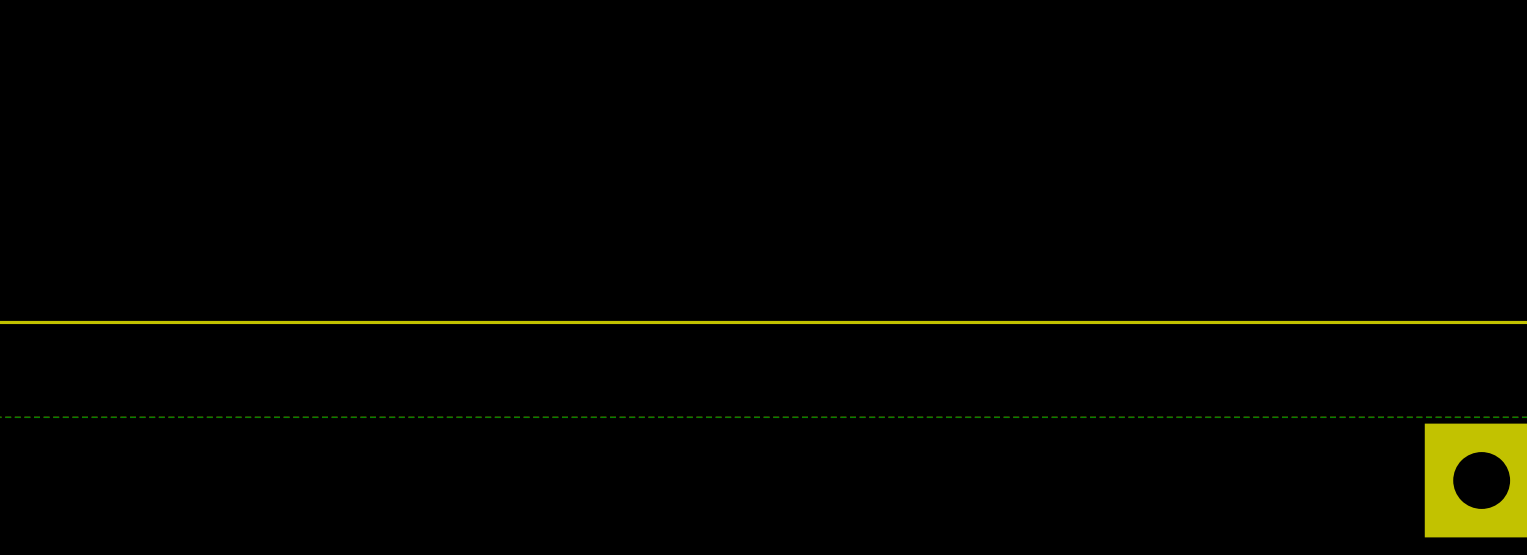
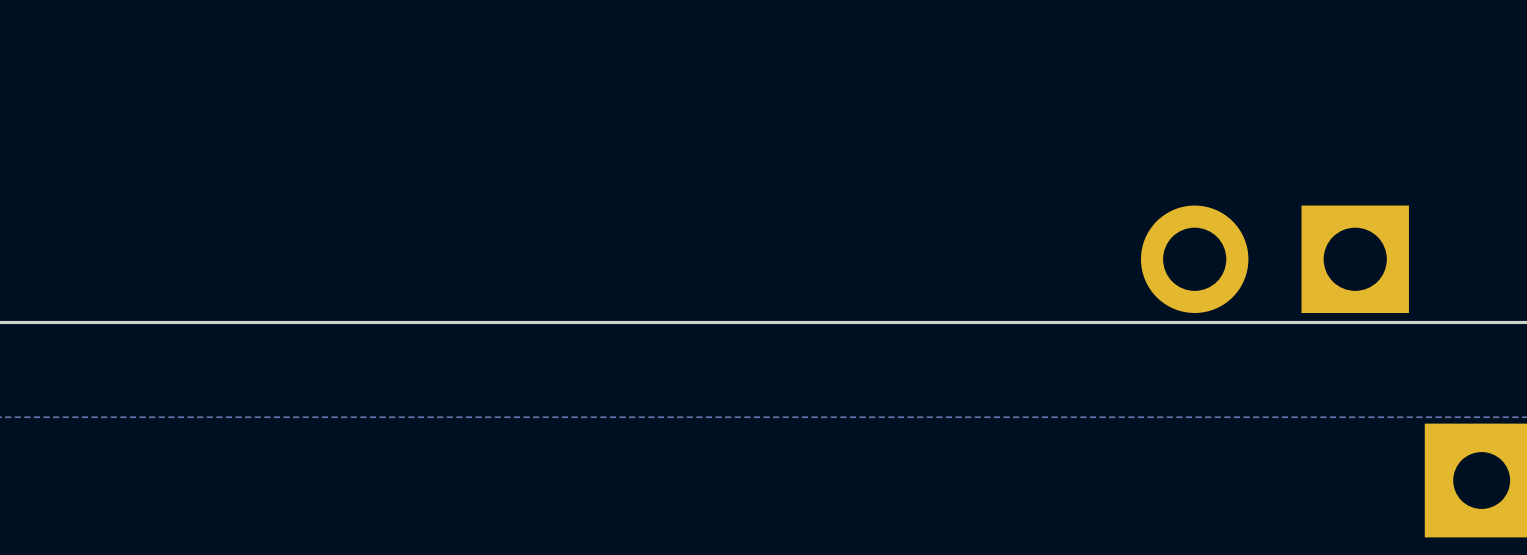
part: none -> (1274, 259)

